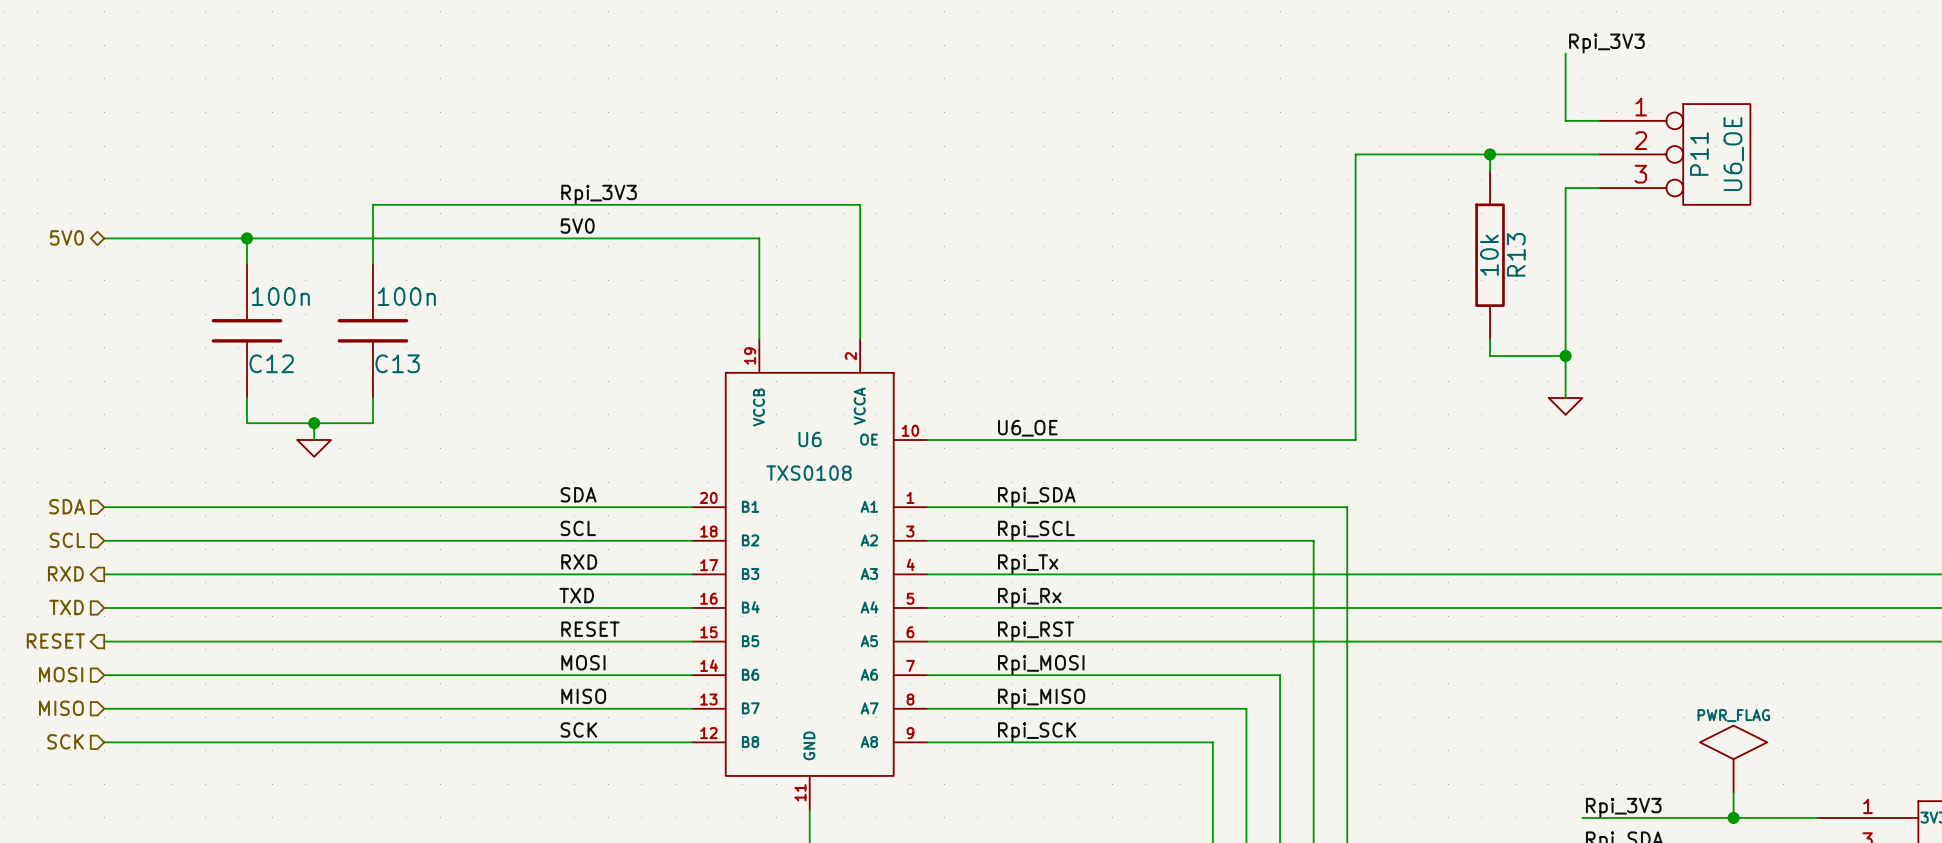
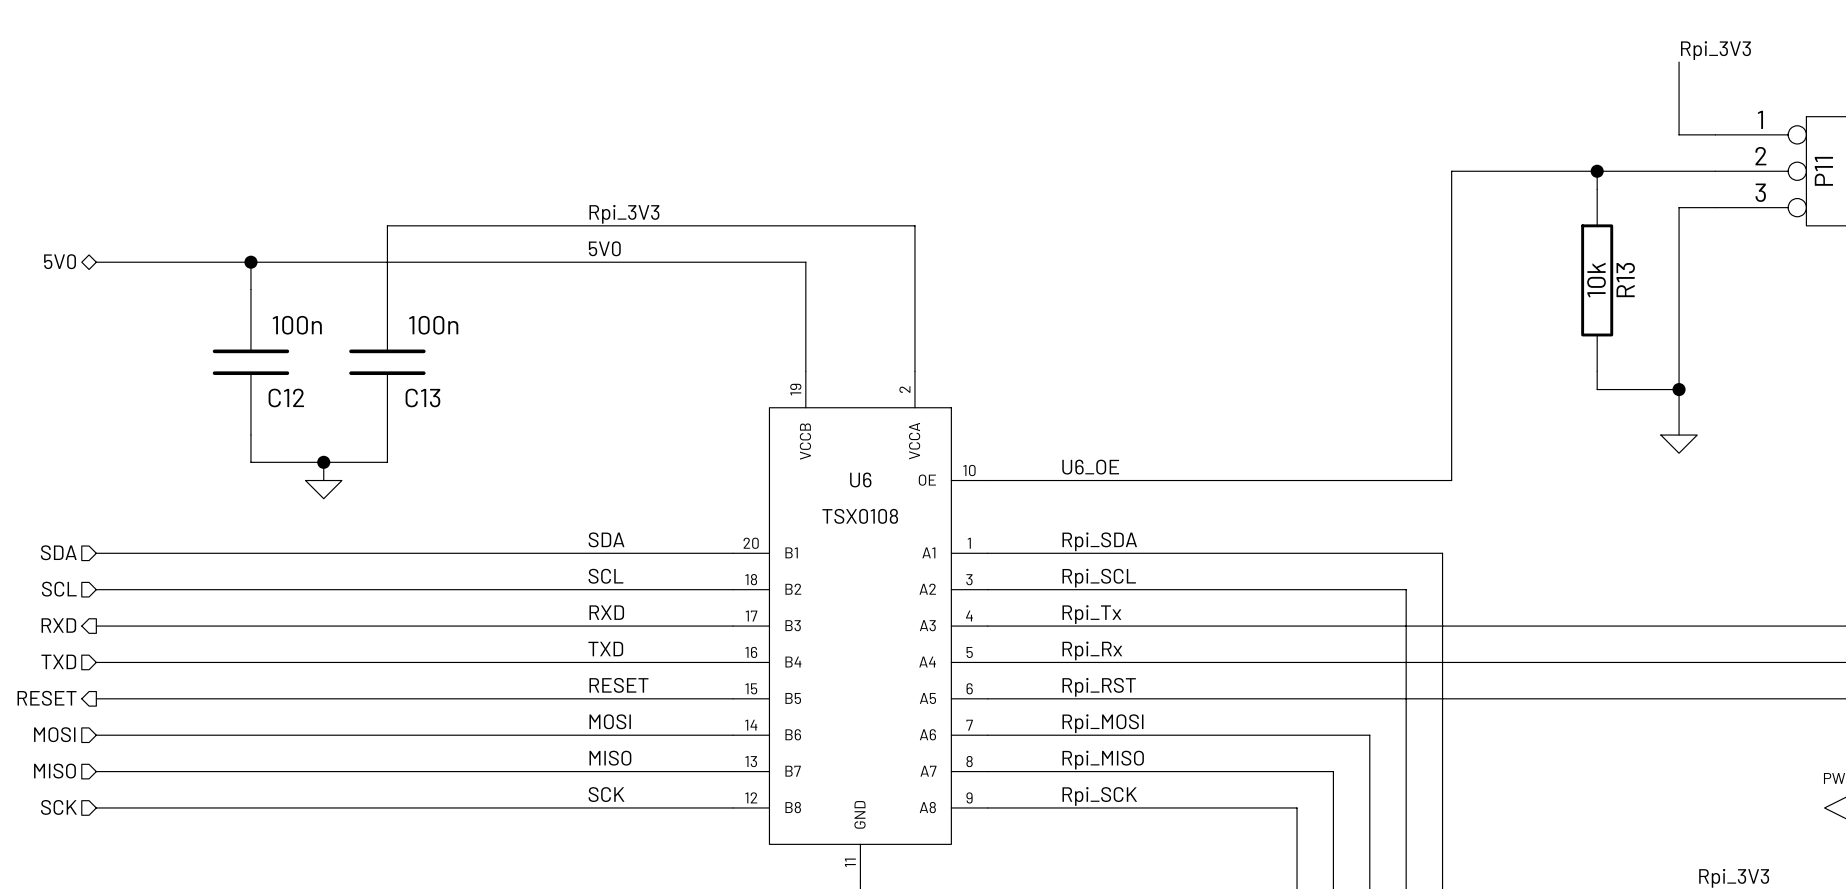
U6 value: TXS0108 (809, 473) -> TSX0108 (860, 516)

